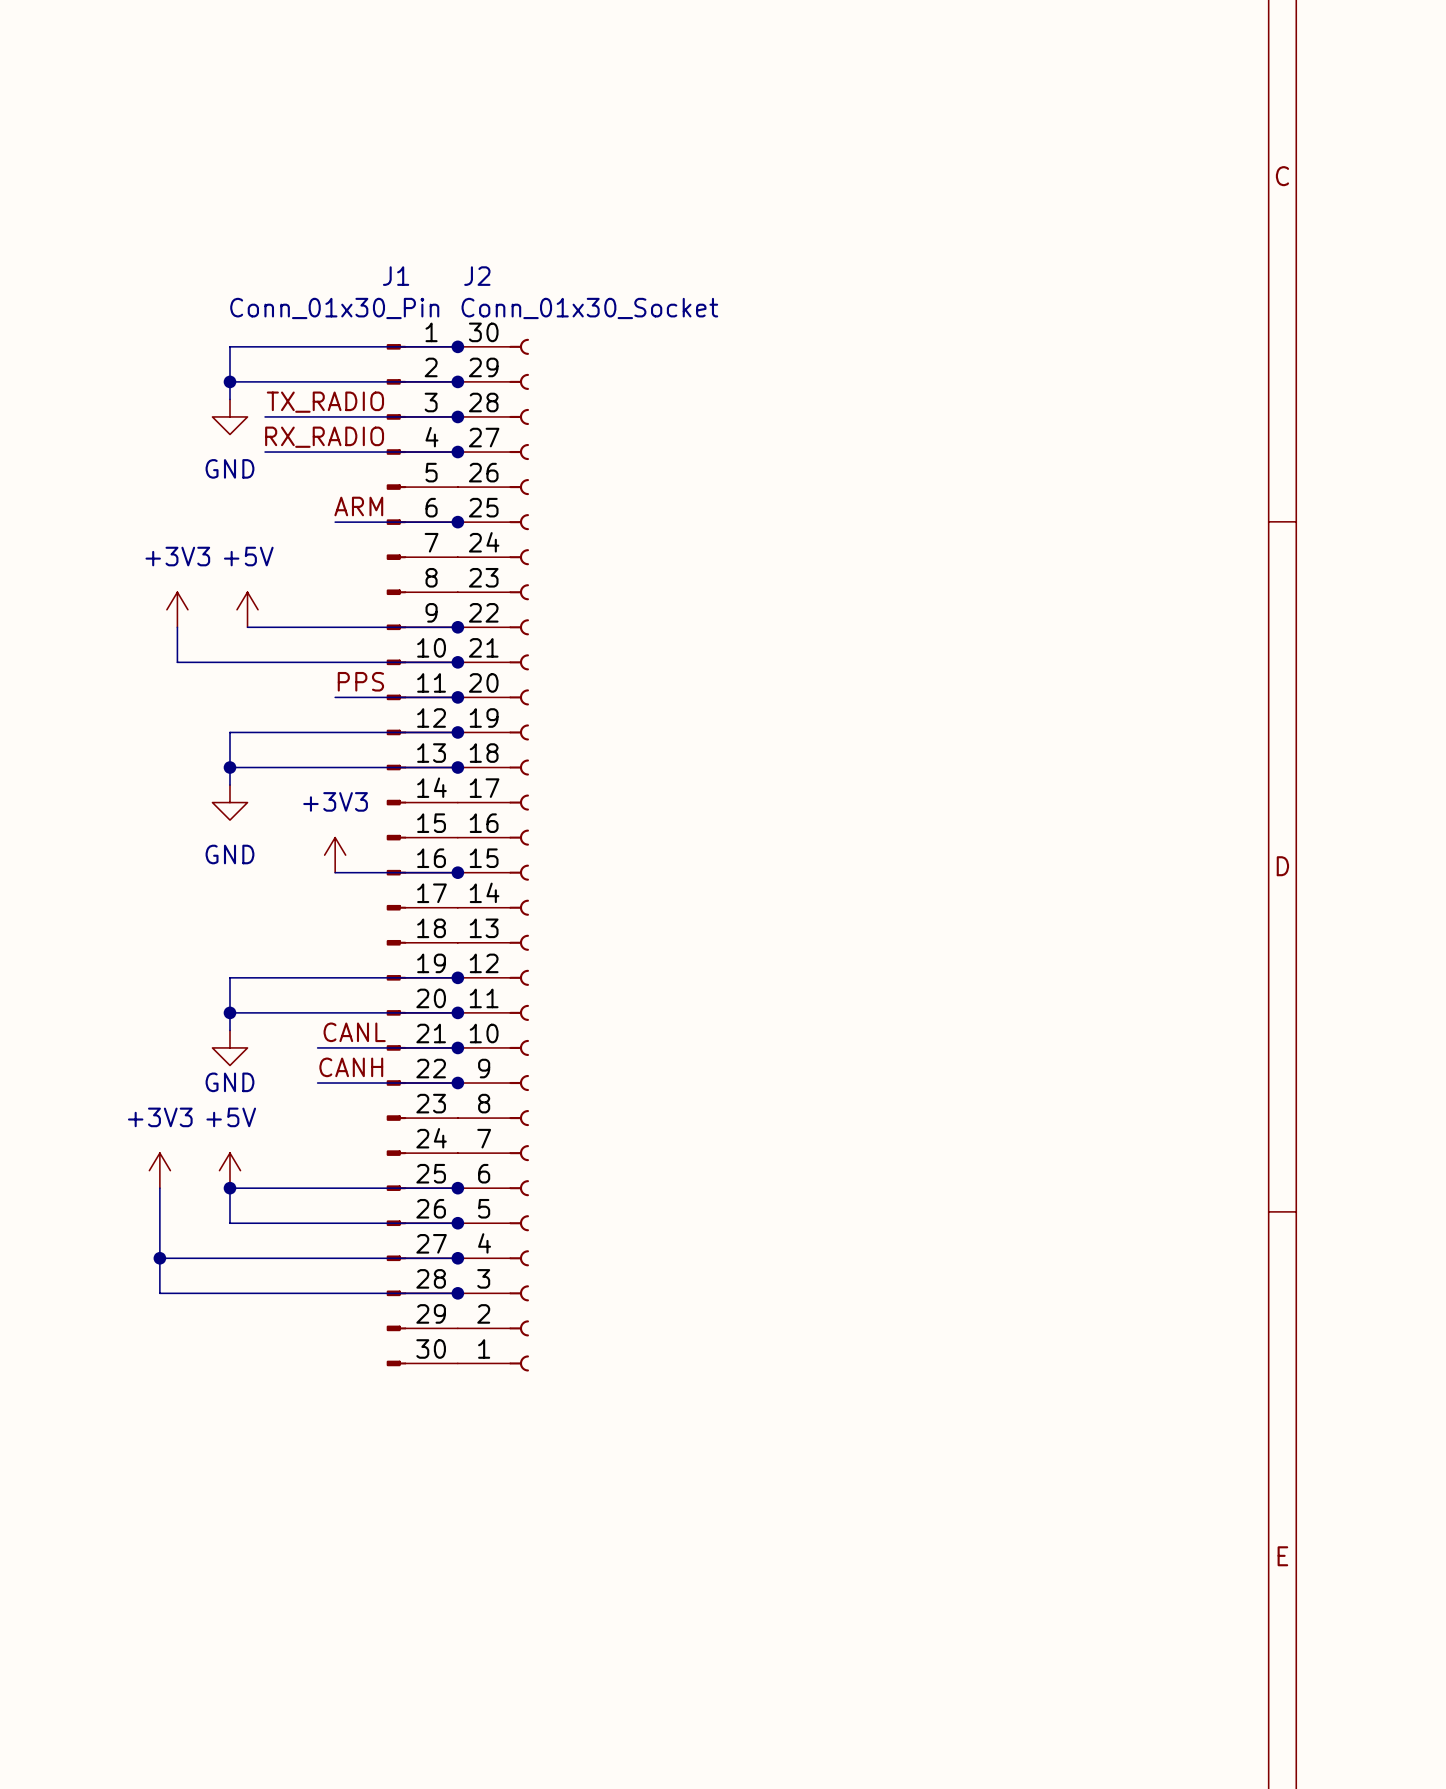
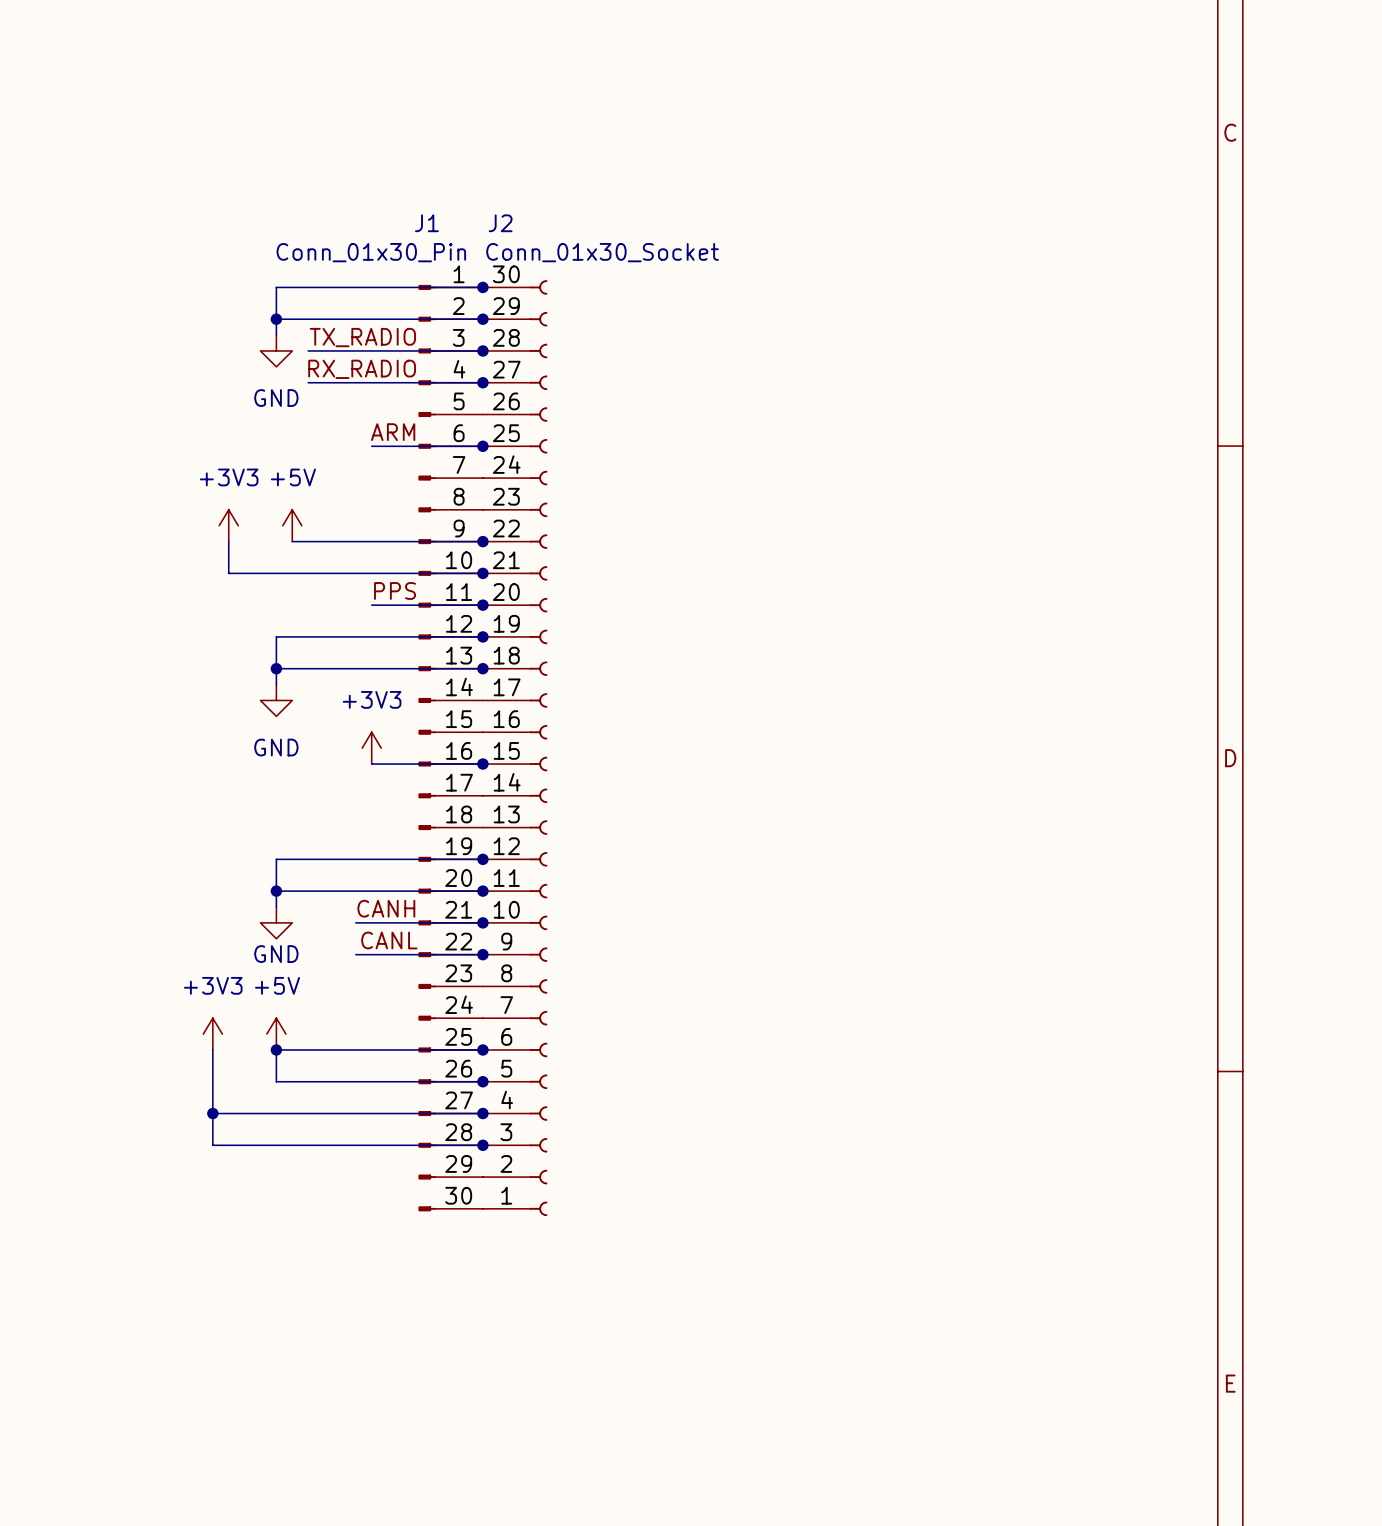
label: CANL (354, 1032) -> CANH (386, 908)
label: CANH (351, 1067) -> CANL (389, 940)

